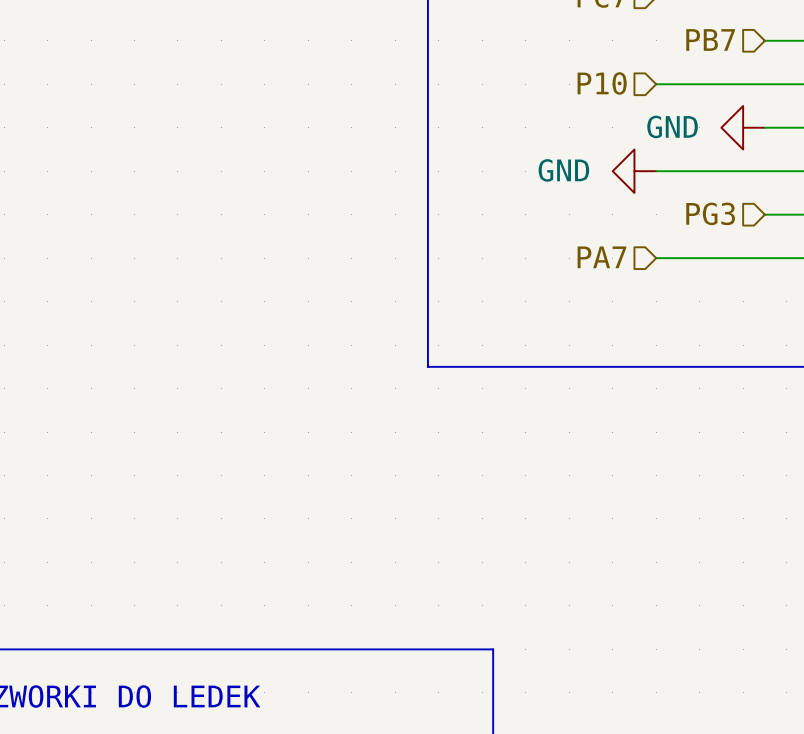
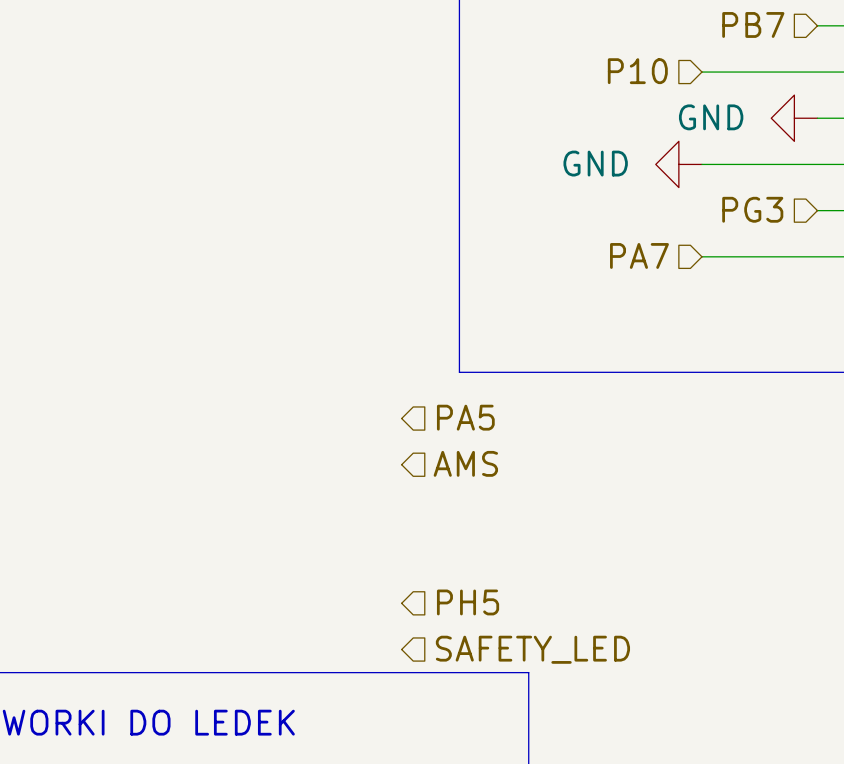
hierarchical label: none -> PA5 (465, 417)
hierarchical label: none -> AMS (465, 463)
hierarchical label: none -> PH5 (468, 602)
hierarchical label: none -> SAFETY_LED (532, 649)

